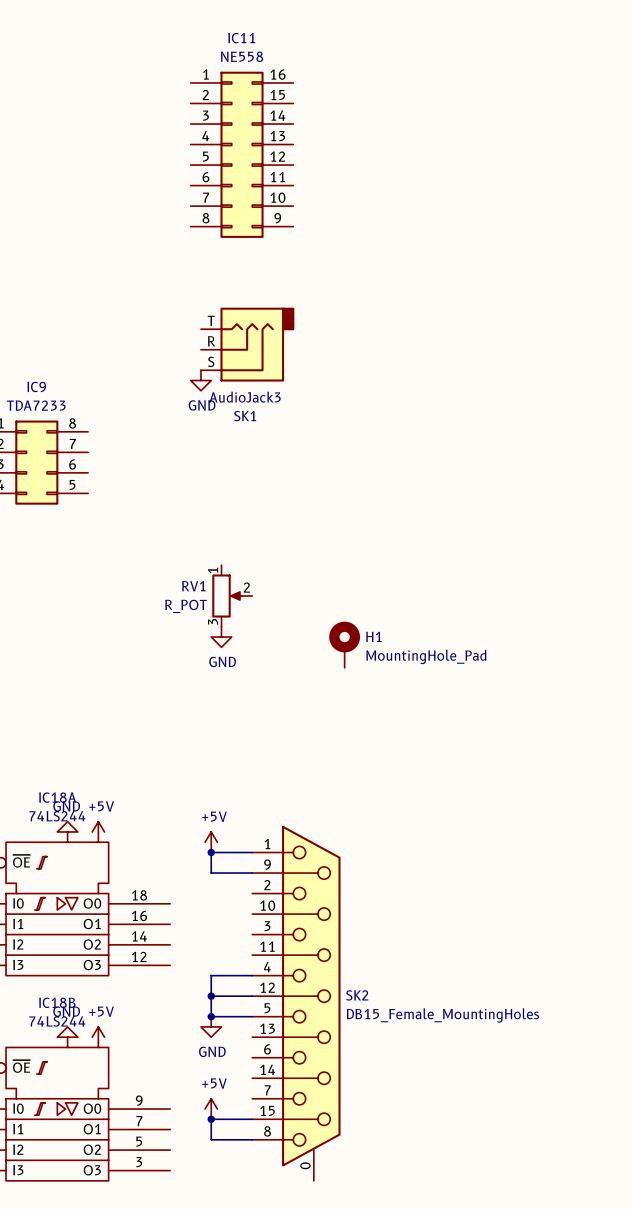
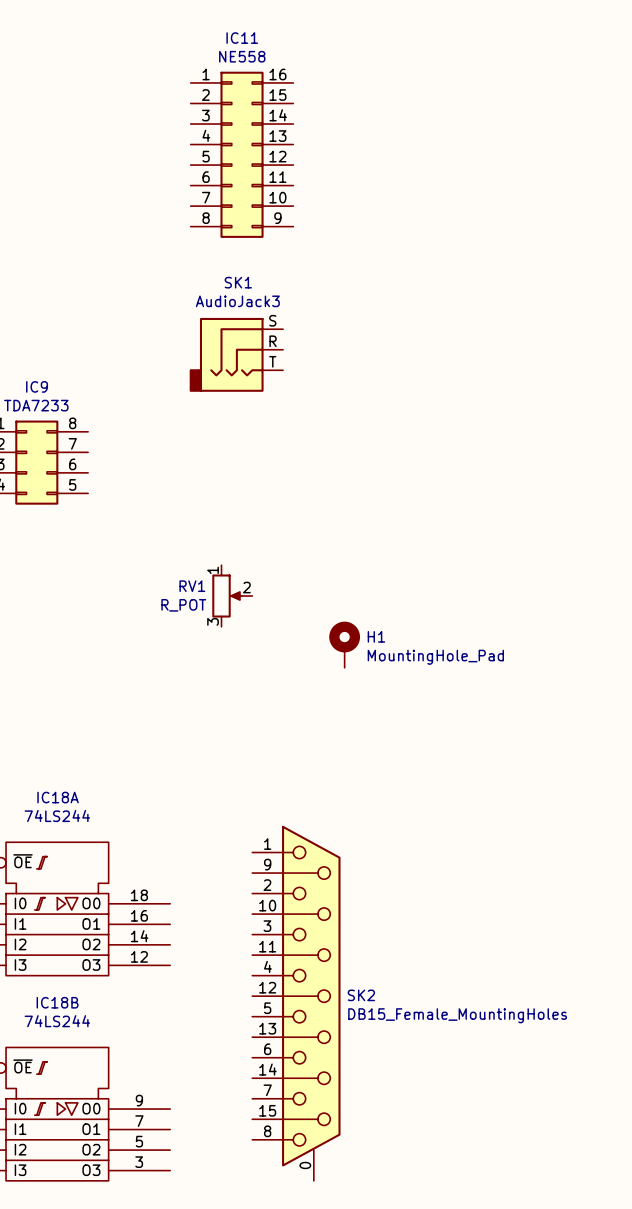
SK1 rotation: 0° (257, 344) -> 180° (226, 354)
power symbol: GND (200, 380) -> none
power symbol: GND (221, 637) -> none
power symbol: GND (67, 831) -> none
power symbol: +5V (98, 831) -> none
power symbol: +5V (211, 842) -> none
junction: (211, 852) -> none
wire: (252, 852) (211, 852) (211, 873) (252, 873) -> none
wire: (252, 975) (211, 975) (211, 1016) (252, 1016) -> none
wire: (211, 996) (252, 996) -> none
junction: (211, 996) -> none
junction: (211, 1016) -> none
power symbol: GND (211, 1026) -> none
power symbol: GND (67, 1037) -> none
power symbol: +5V (98, 1037) -> none
power symbol: +5V (211, 1109) -> none
junction: (211, 1119) -> none
wire: (252, 1119) (211, 1119) (211, 1139) (252, 1139) -> none

